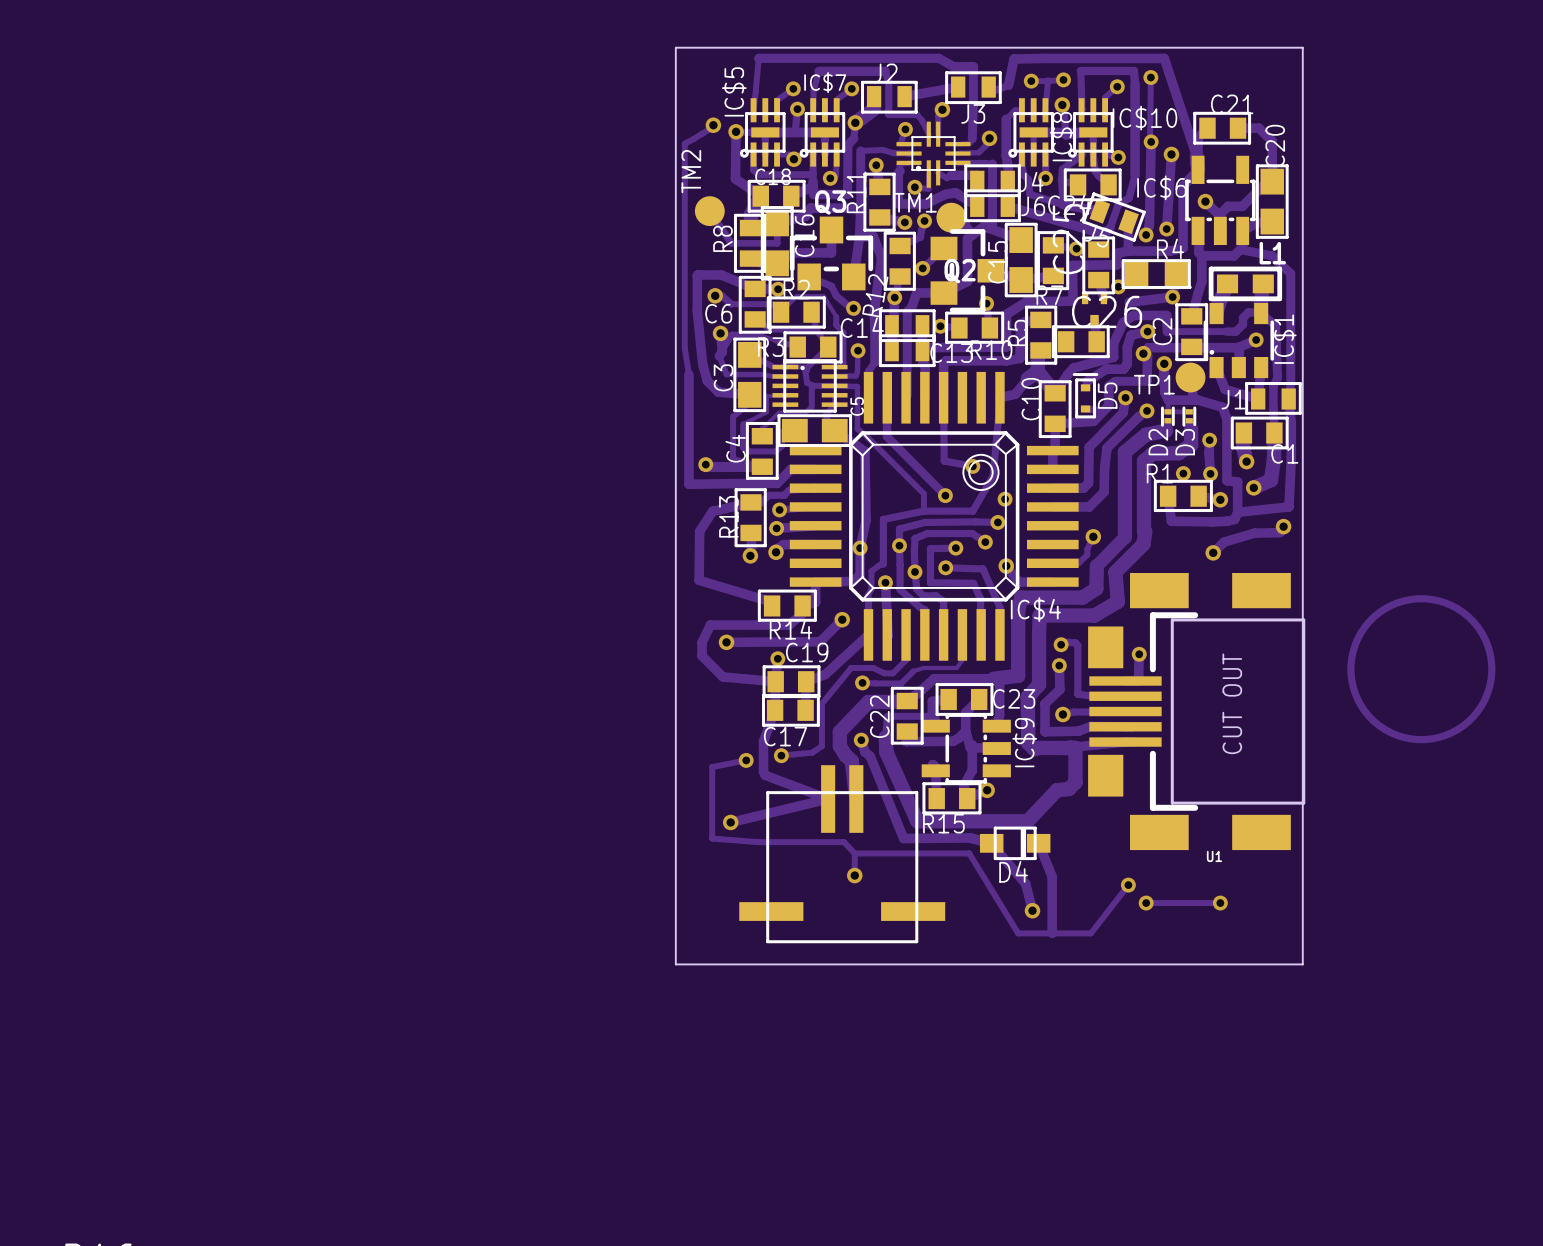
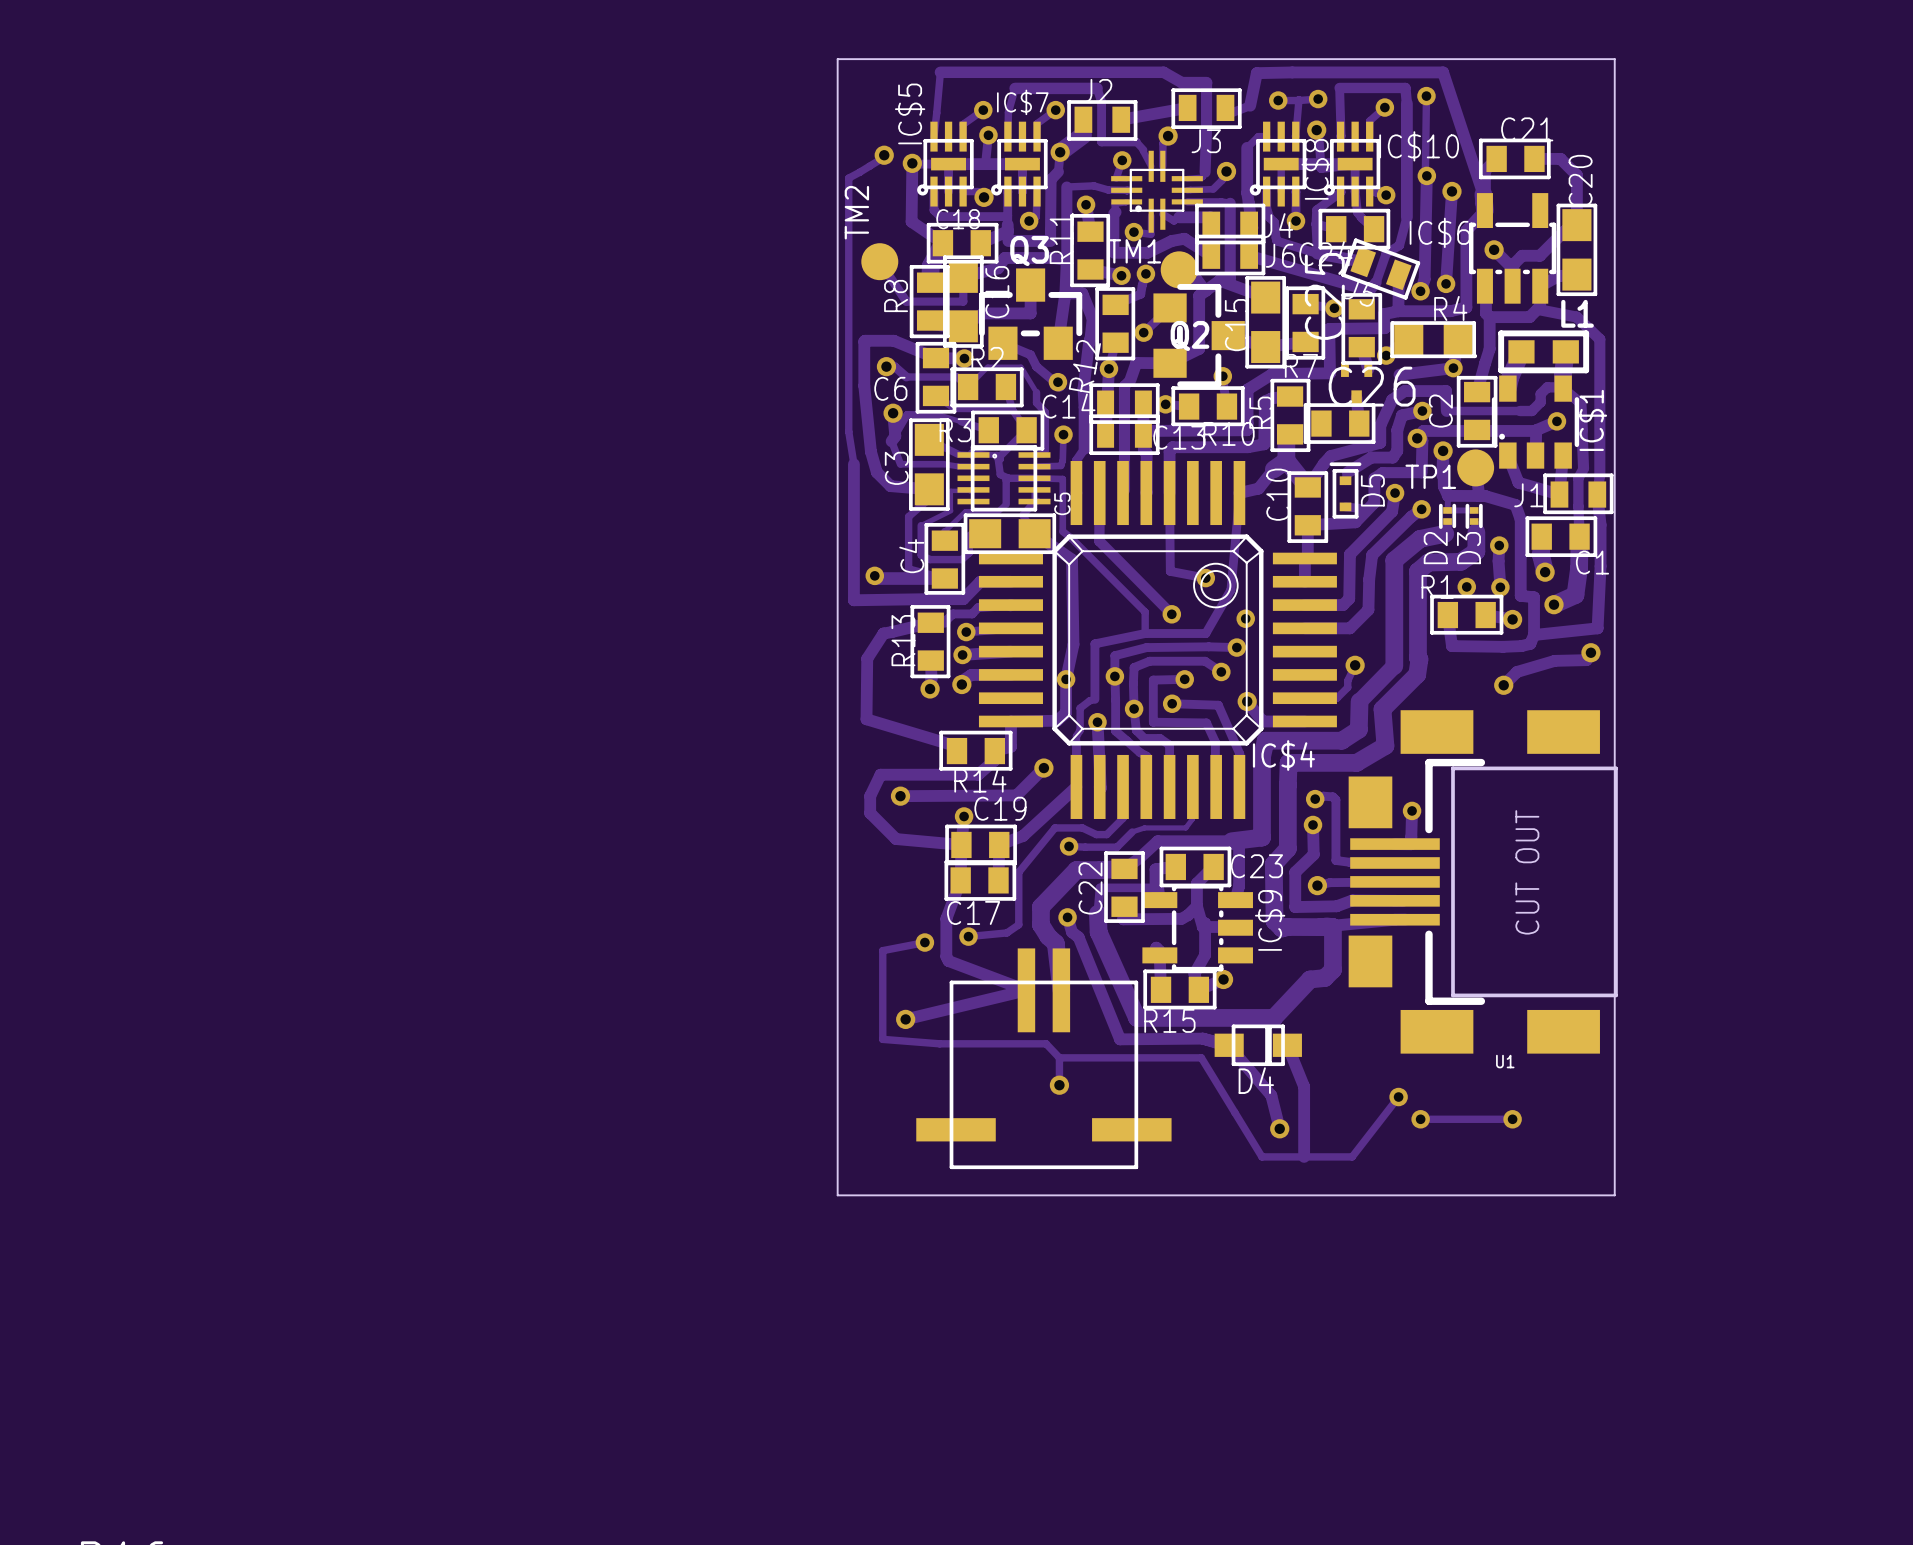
drawing: [1347, 595, 1496, 744] -> none

